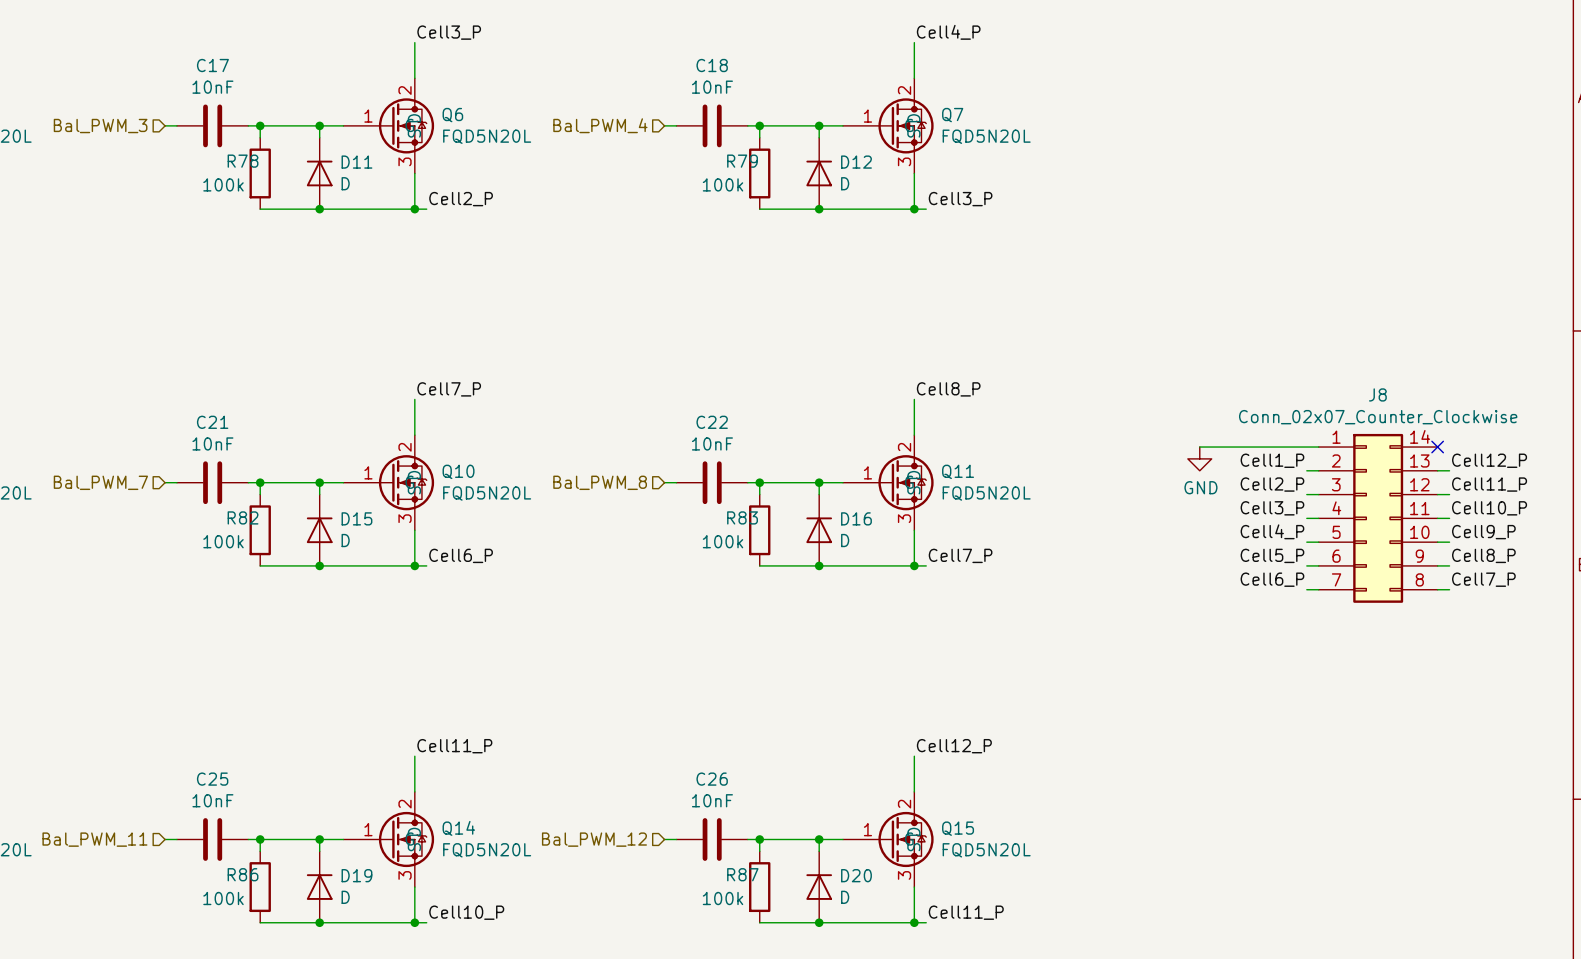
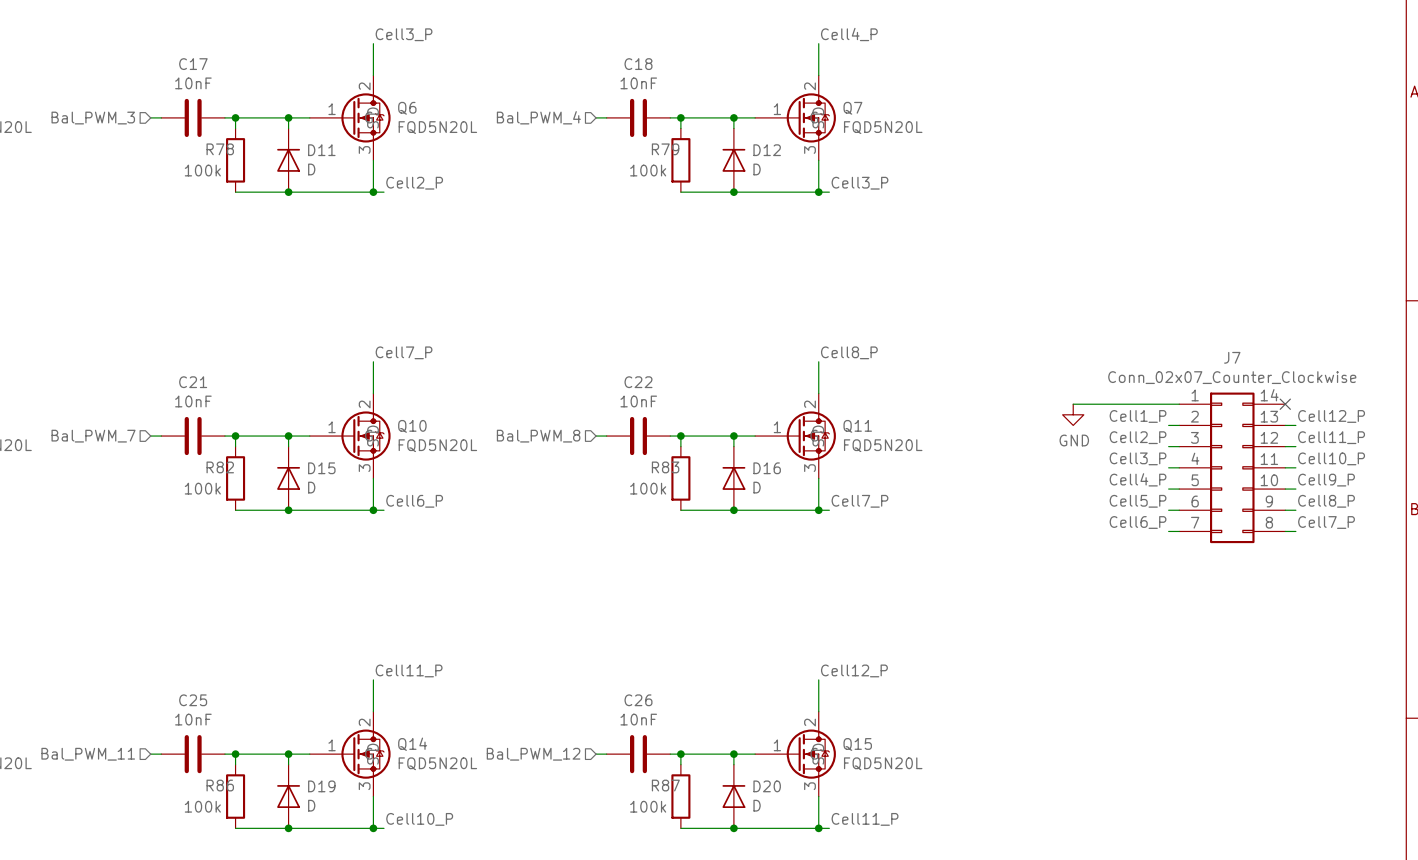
J8 name: J8 (1377, 394) -> J7 (1232, 357)

